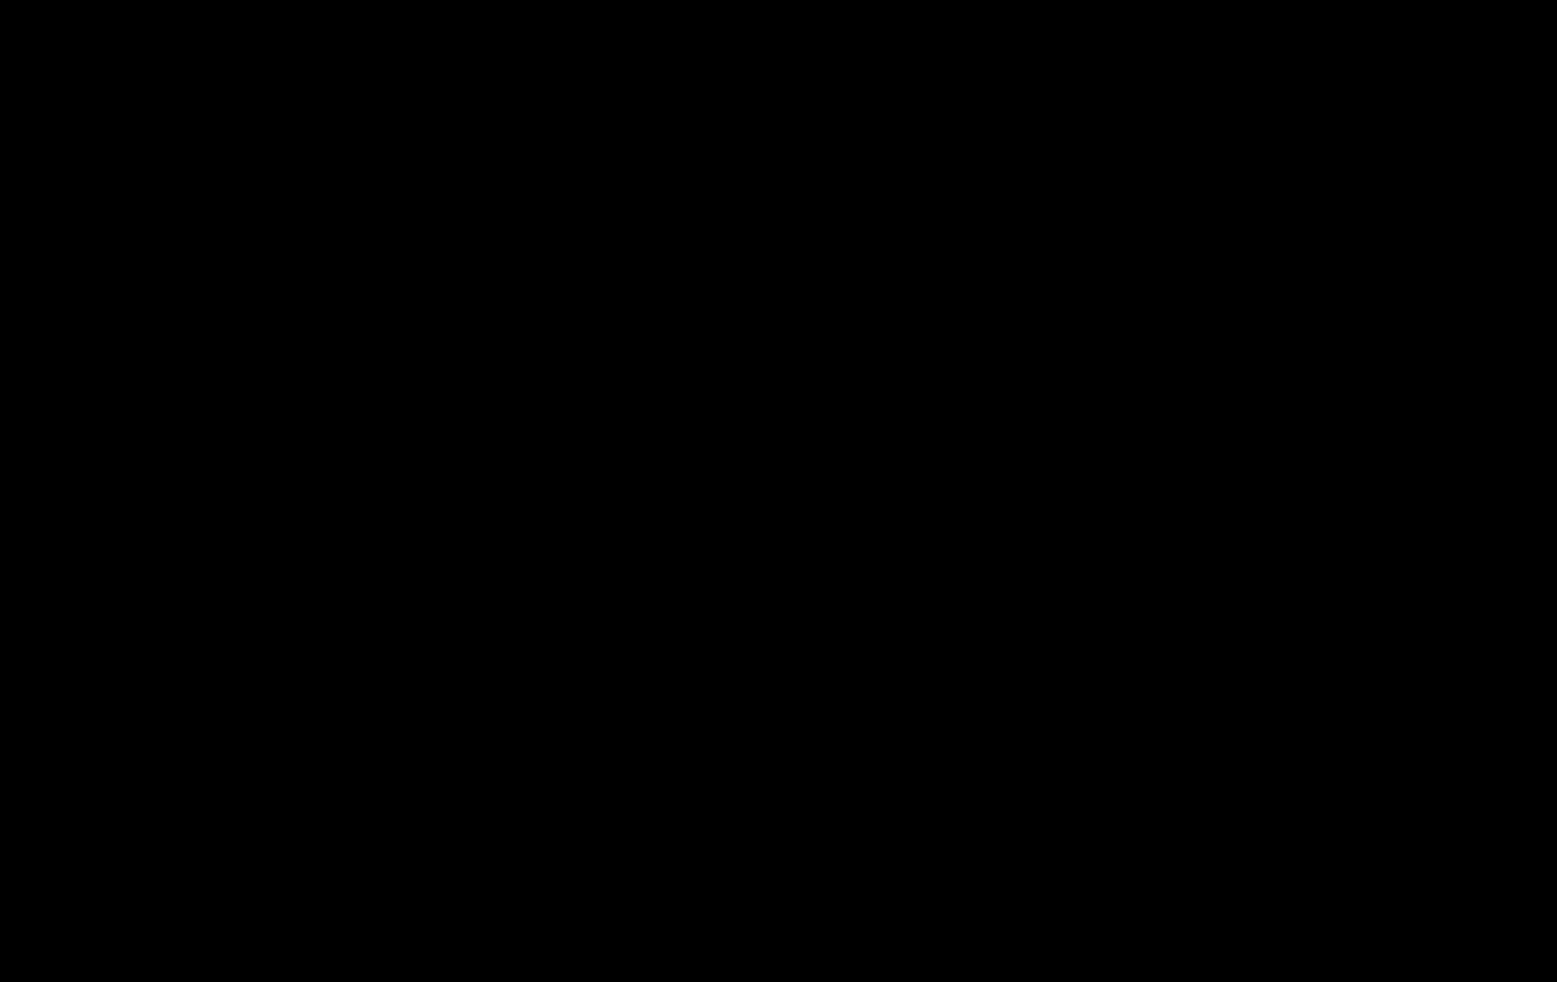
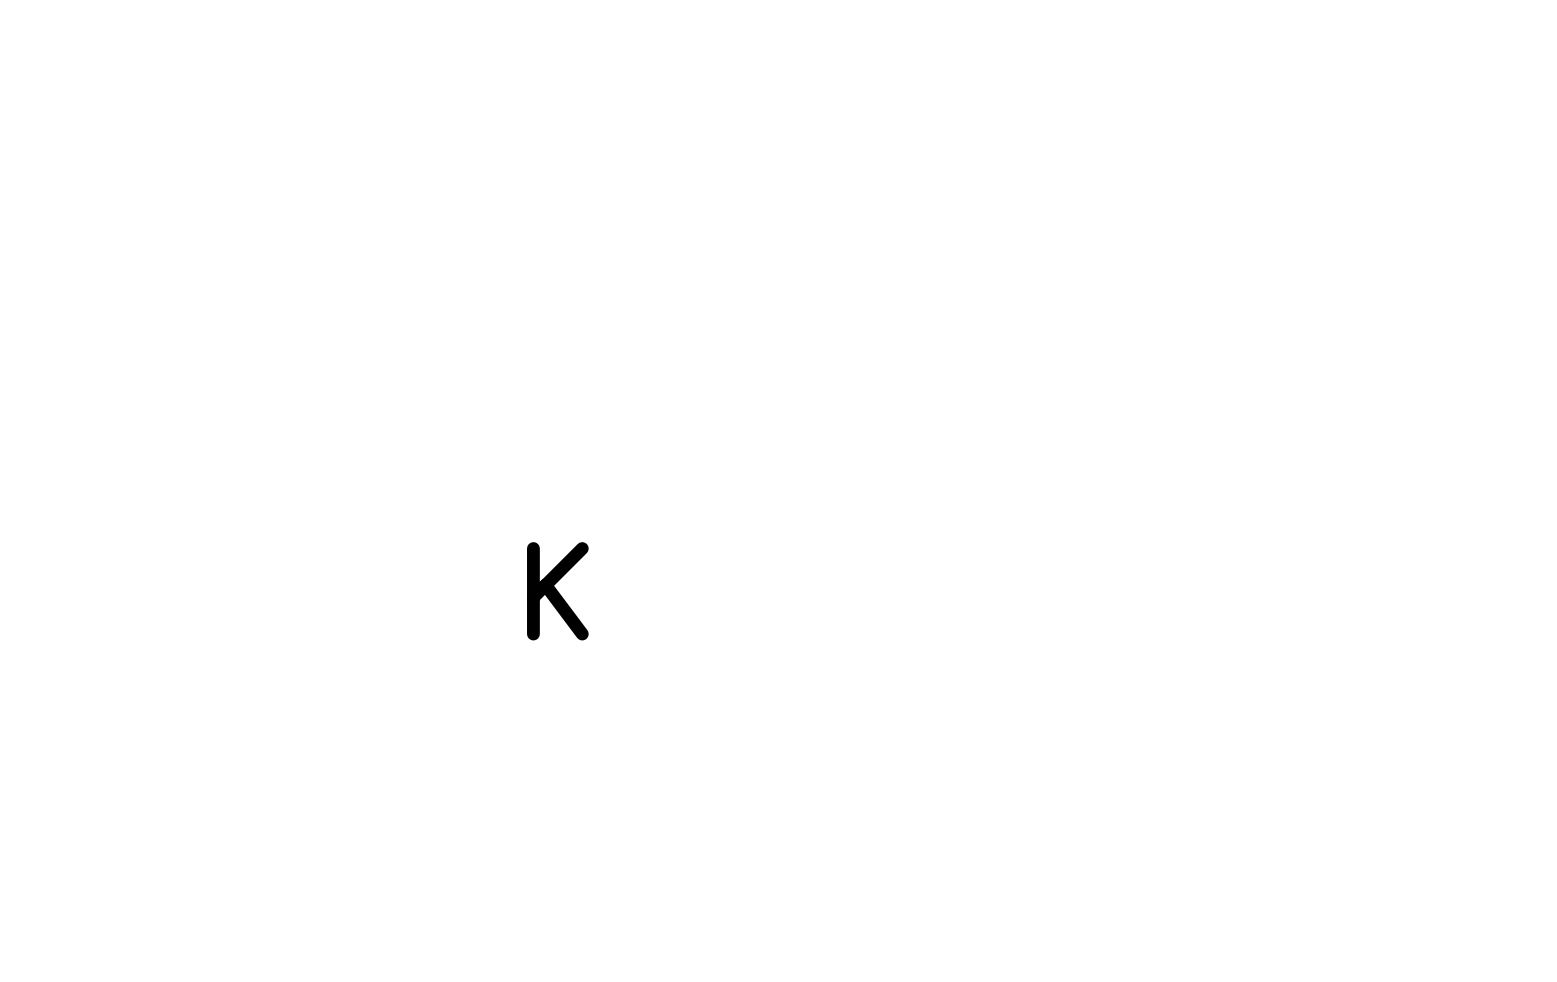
part text: none -> K (557, 591)

